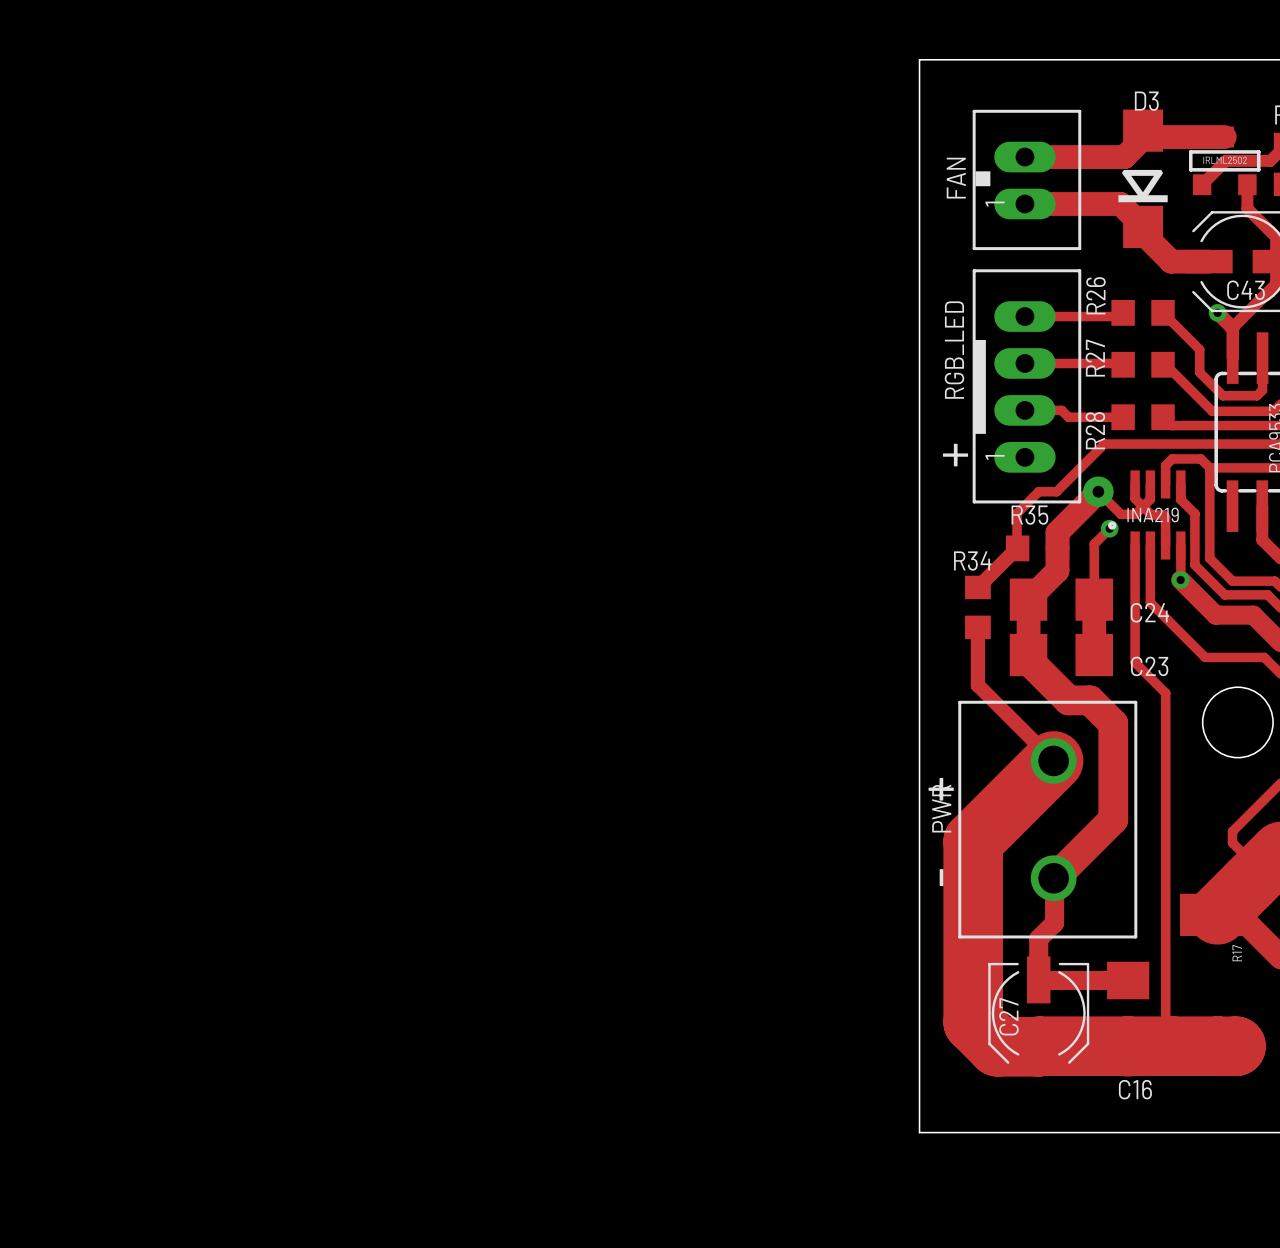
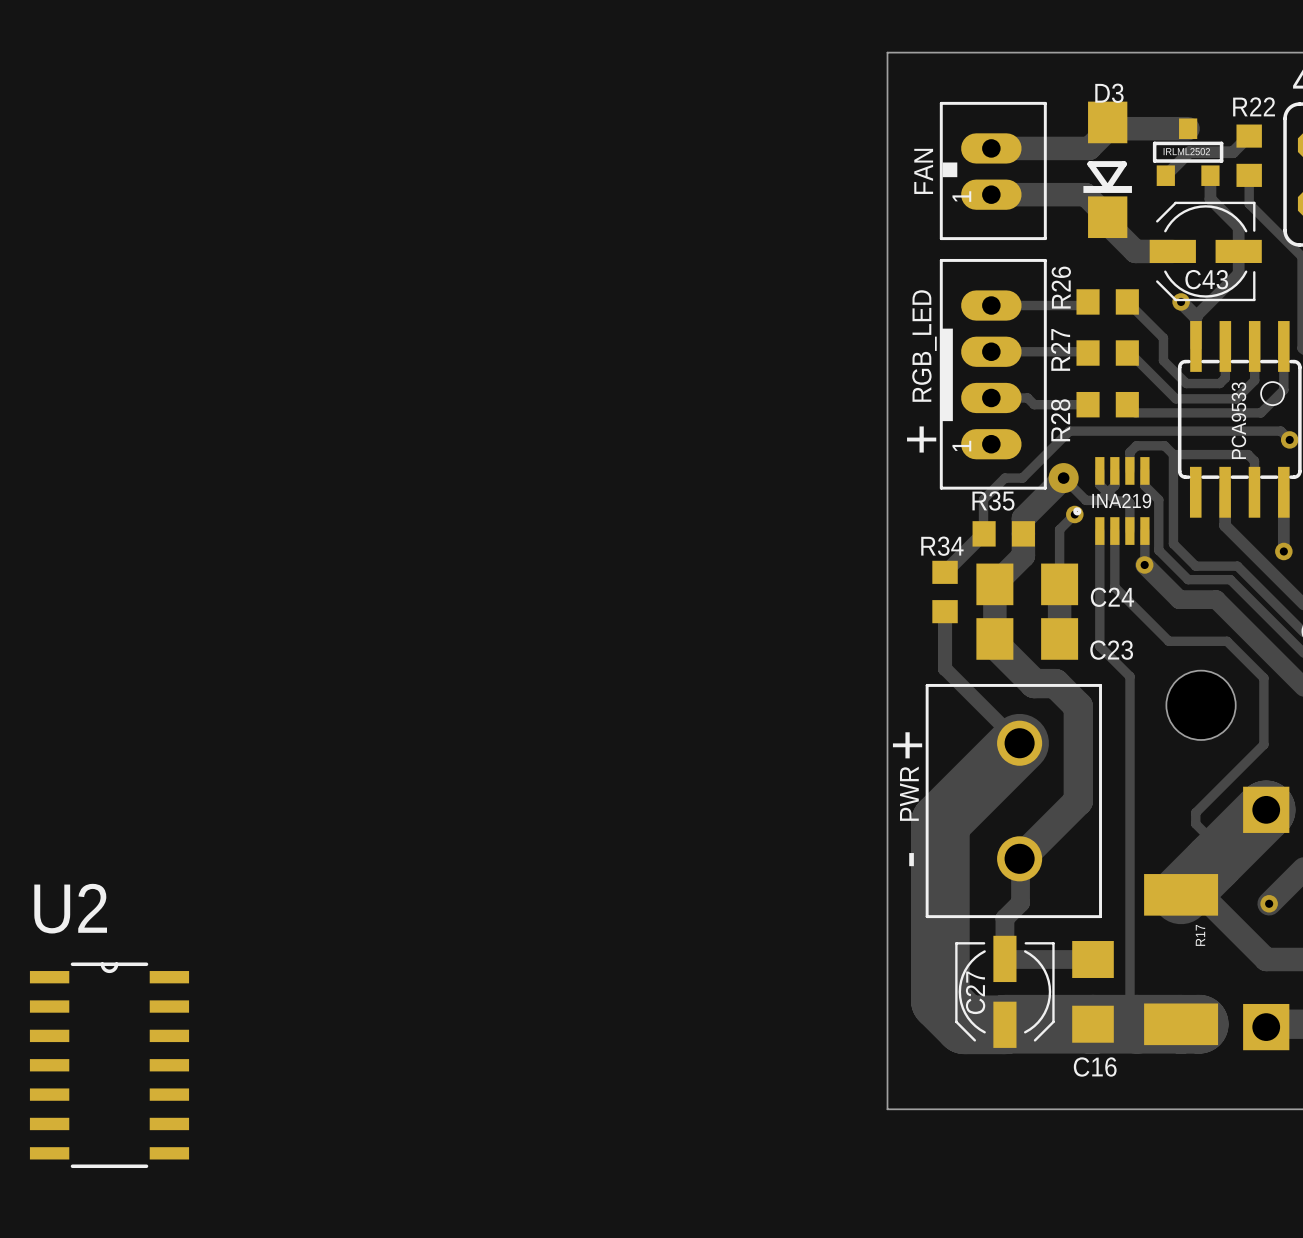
U2: none -> (109, 1065)

